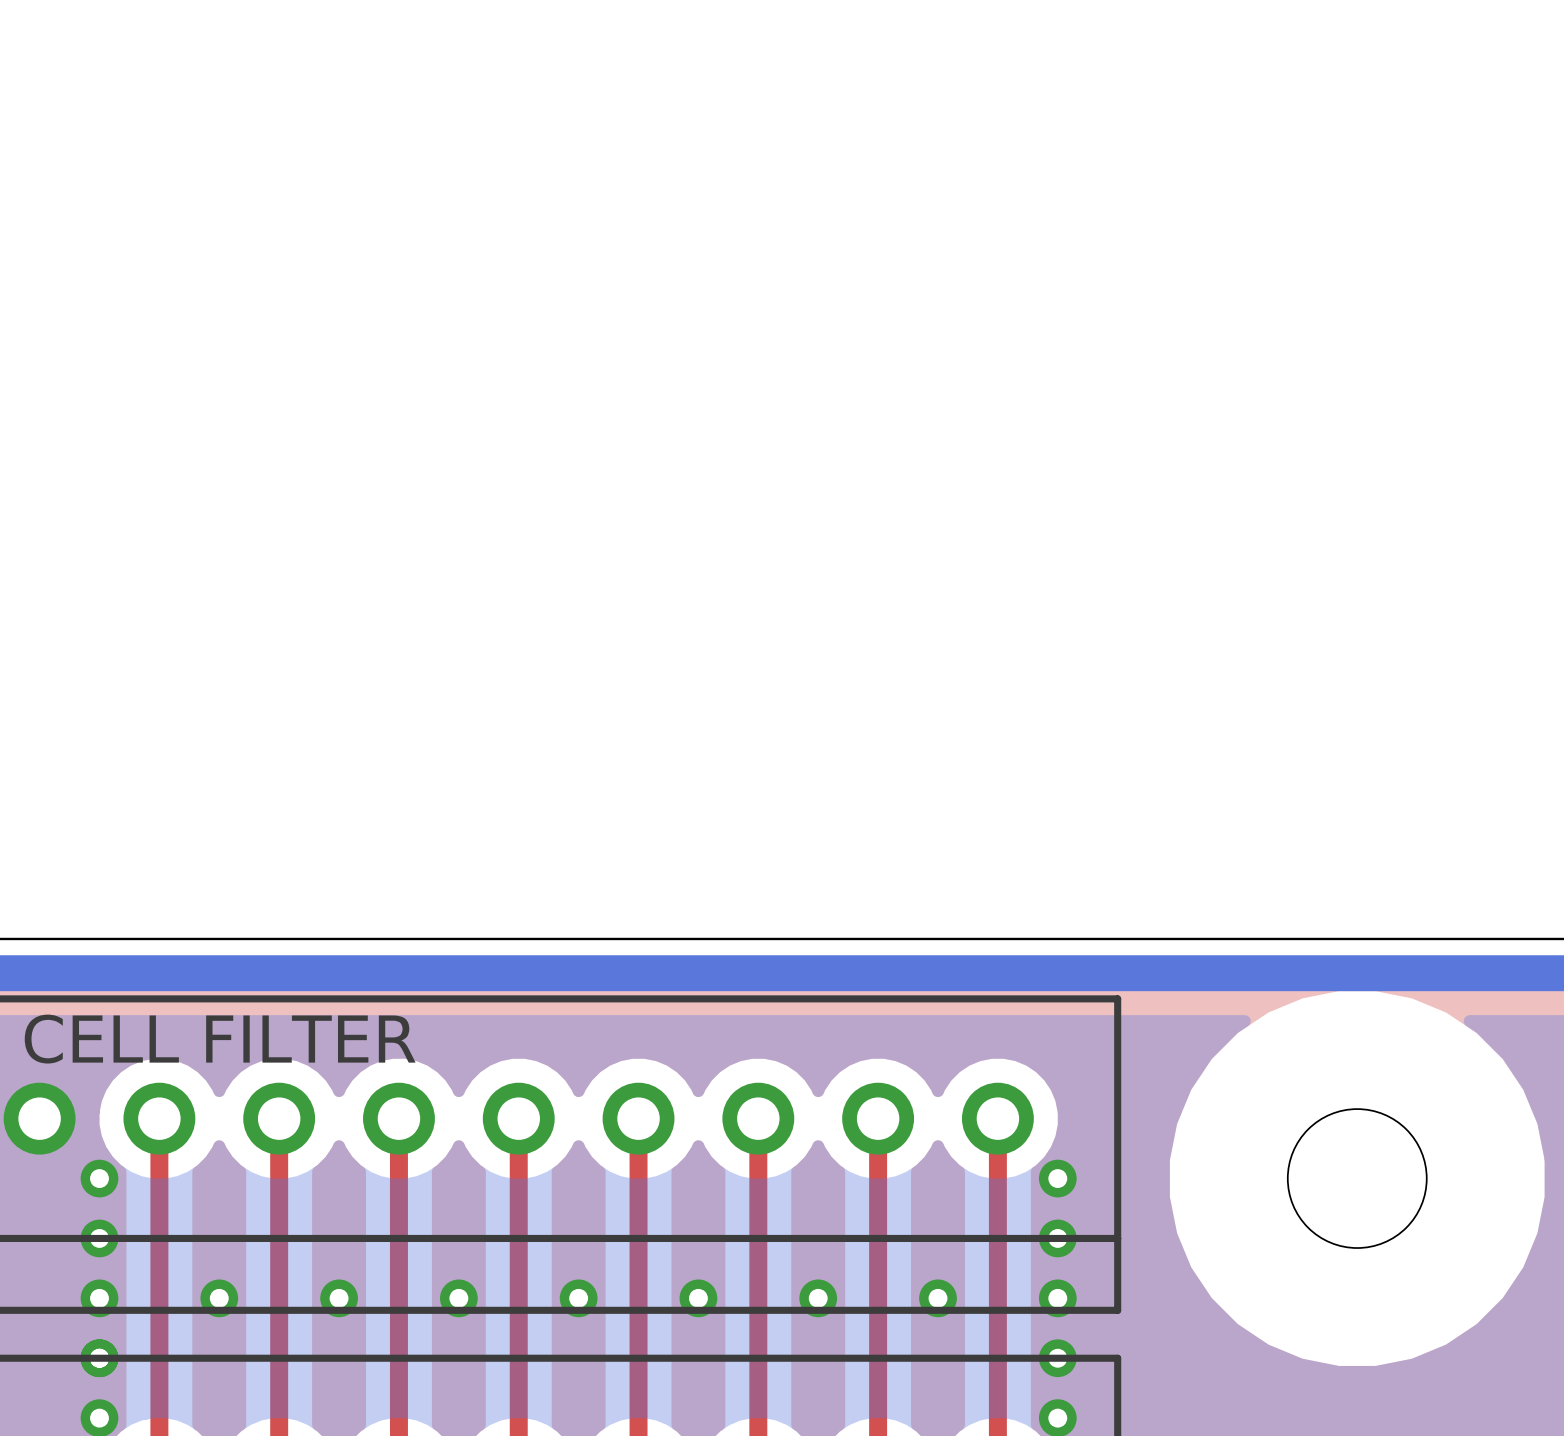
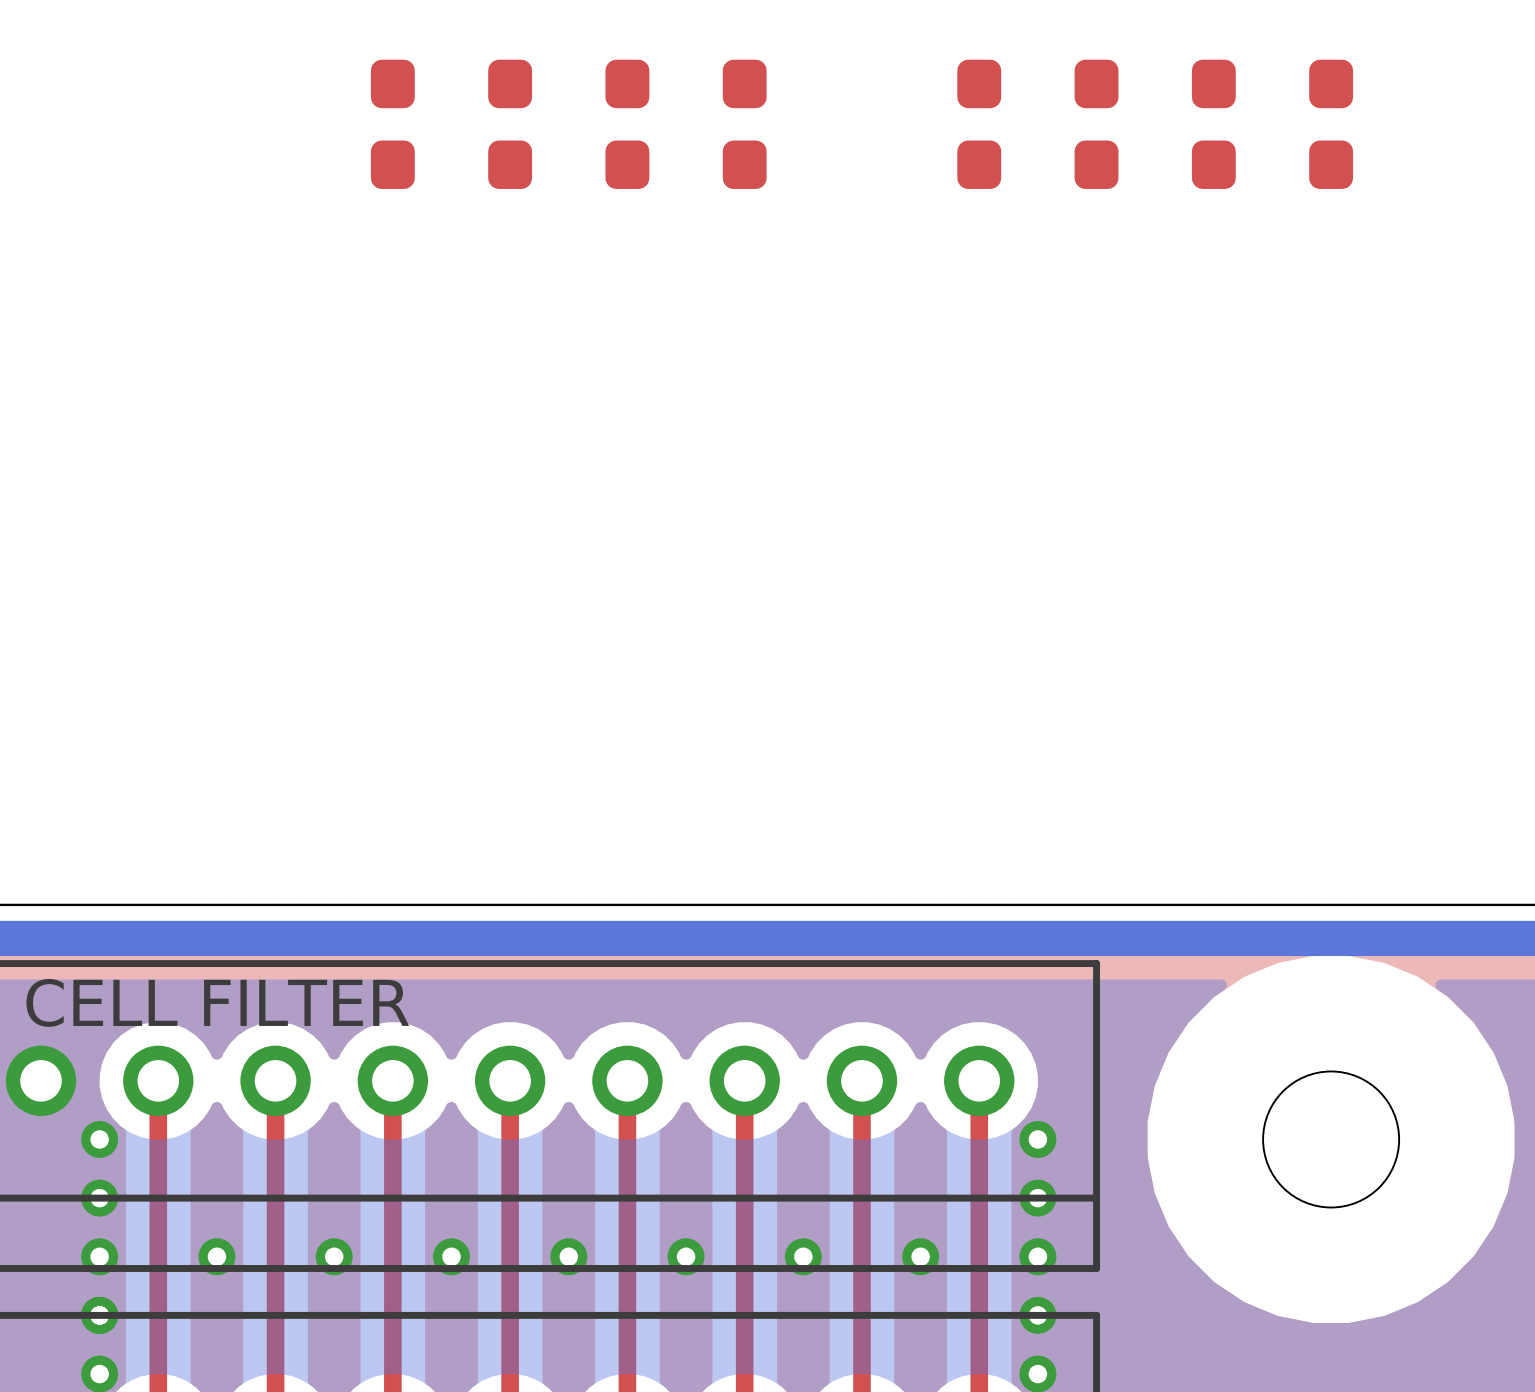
part: none -> (392, 124)
part: none -> (510, 124)
part: none -> (627, 124)
part: none -> (744, 124)
part: none -> (979, 124)
part: none -> (1096, 124)
part: none -> (1213, 124)
part: none -> (1331, 124)

